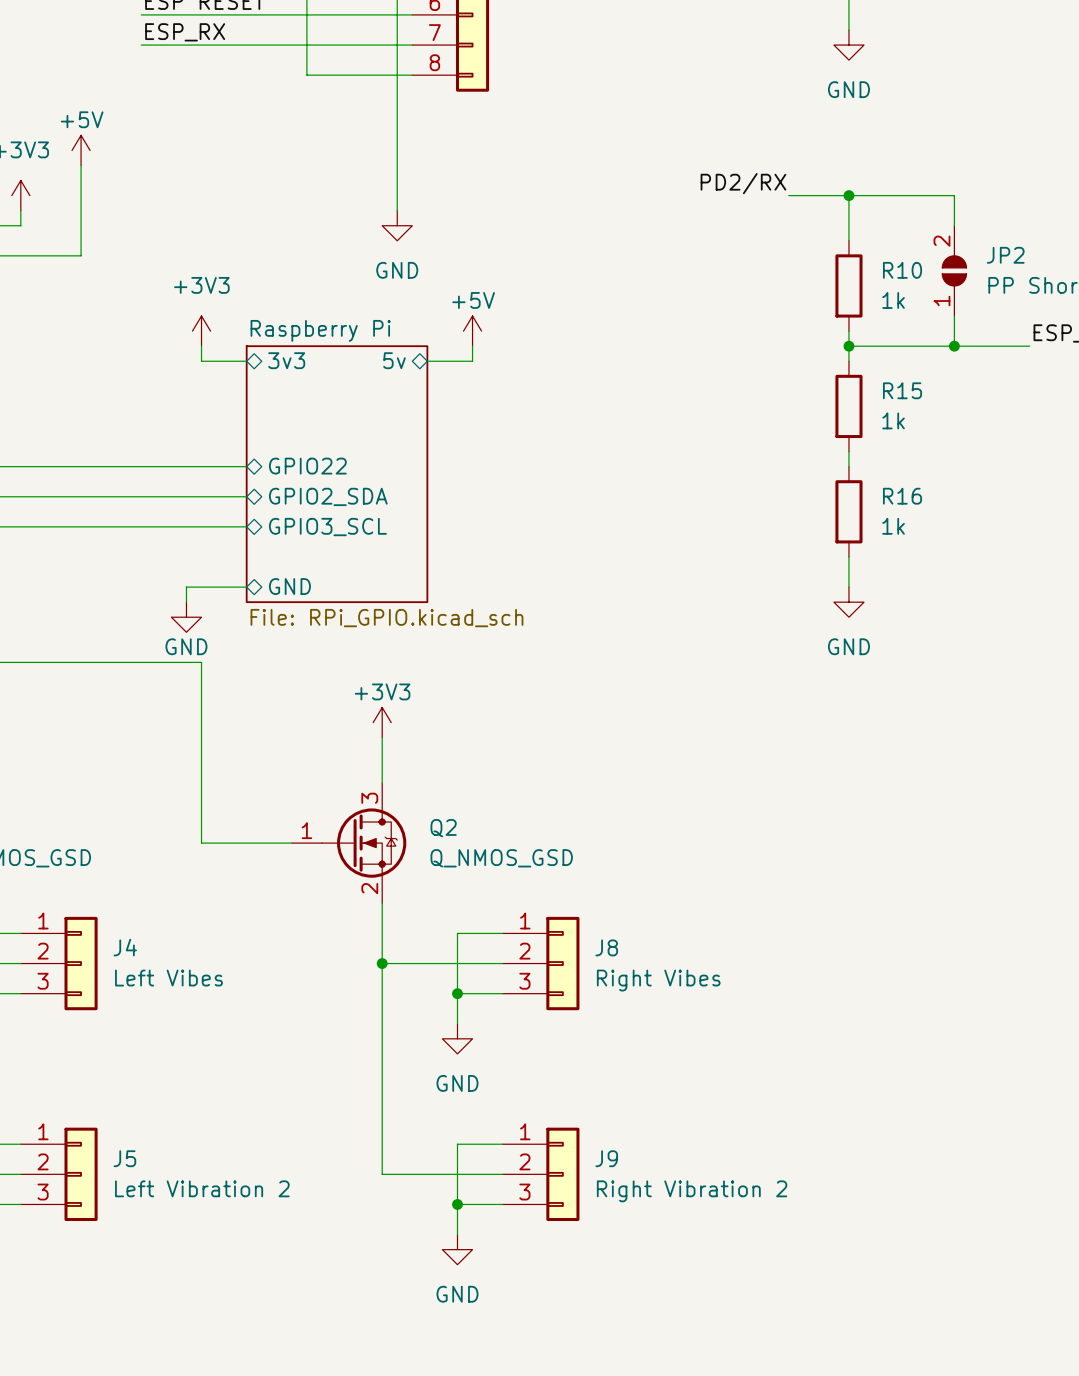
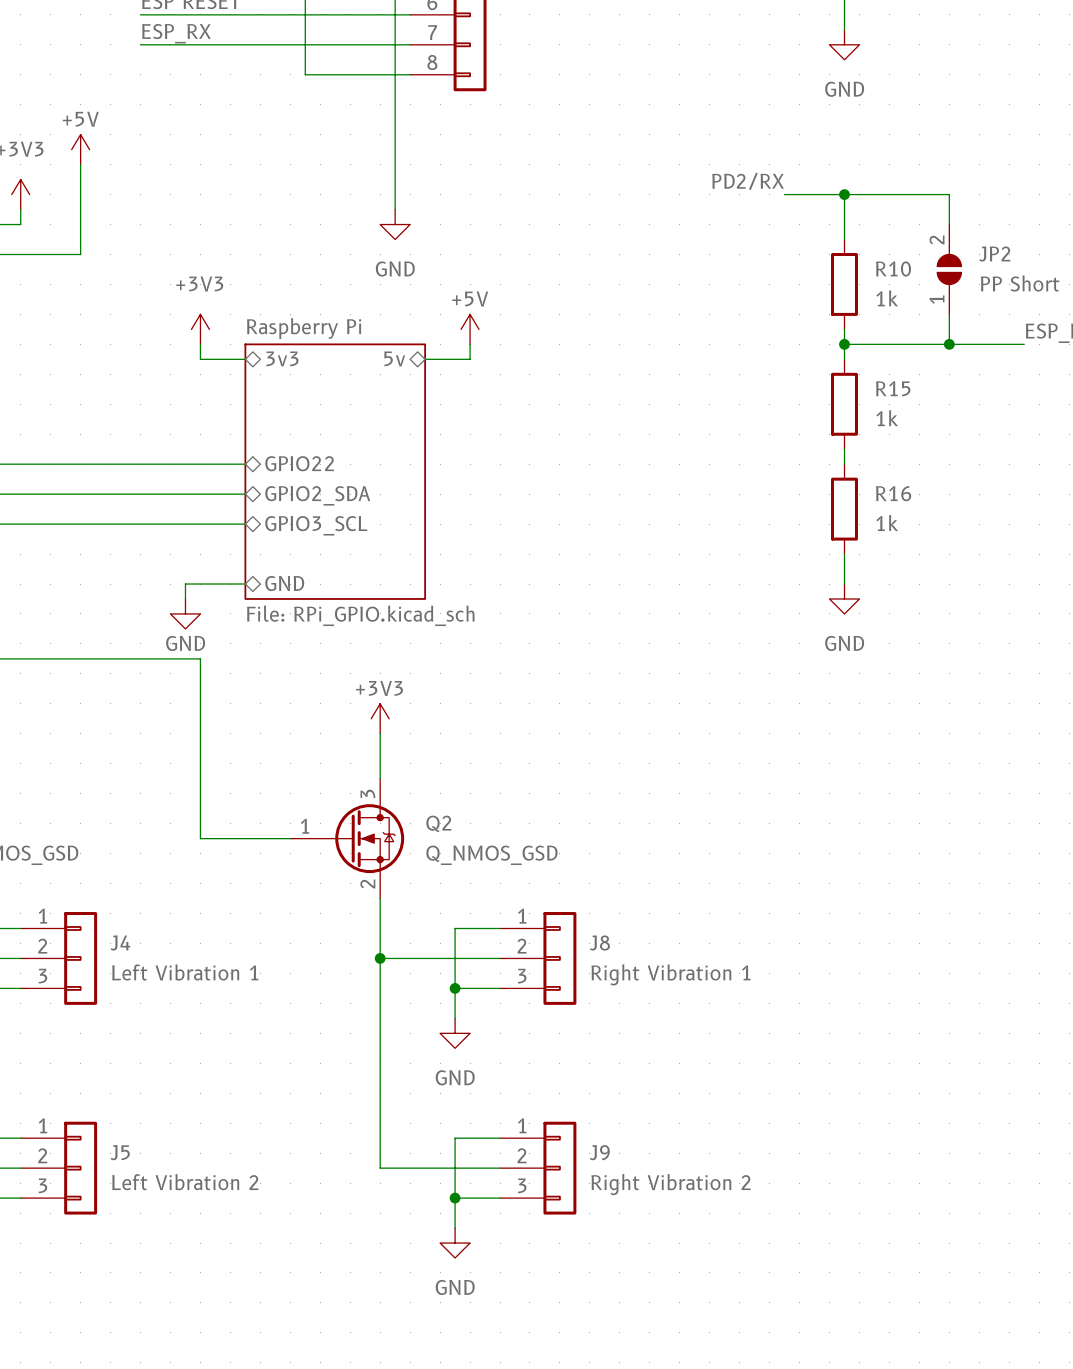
J4 value: Left Vibes (169, 978) -> Left Vibration 1 (185, 972)
J8 value: Right Vibes (658, 980) -> Right Vibration 1 (670, 974)

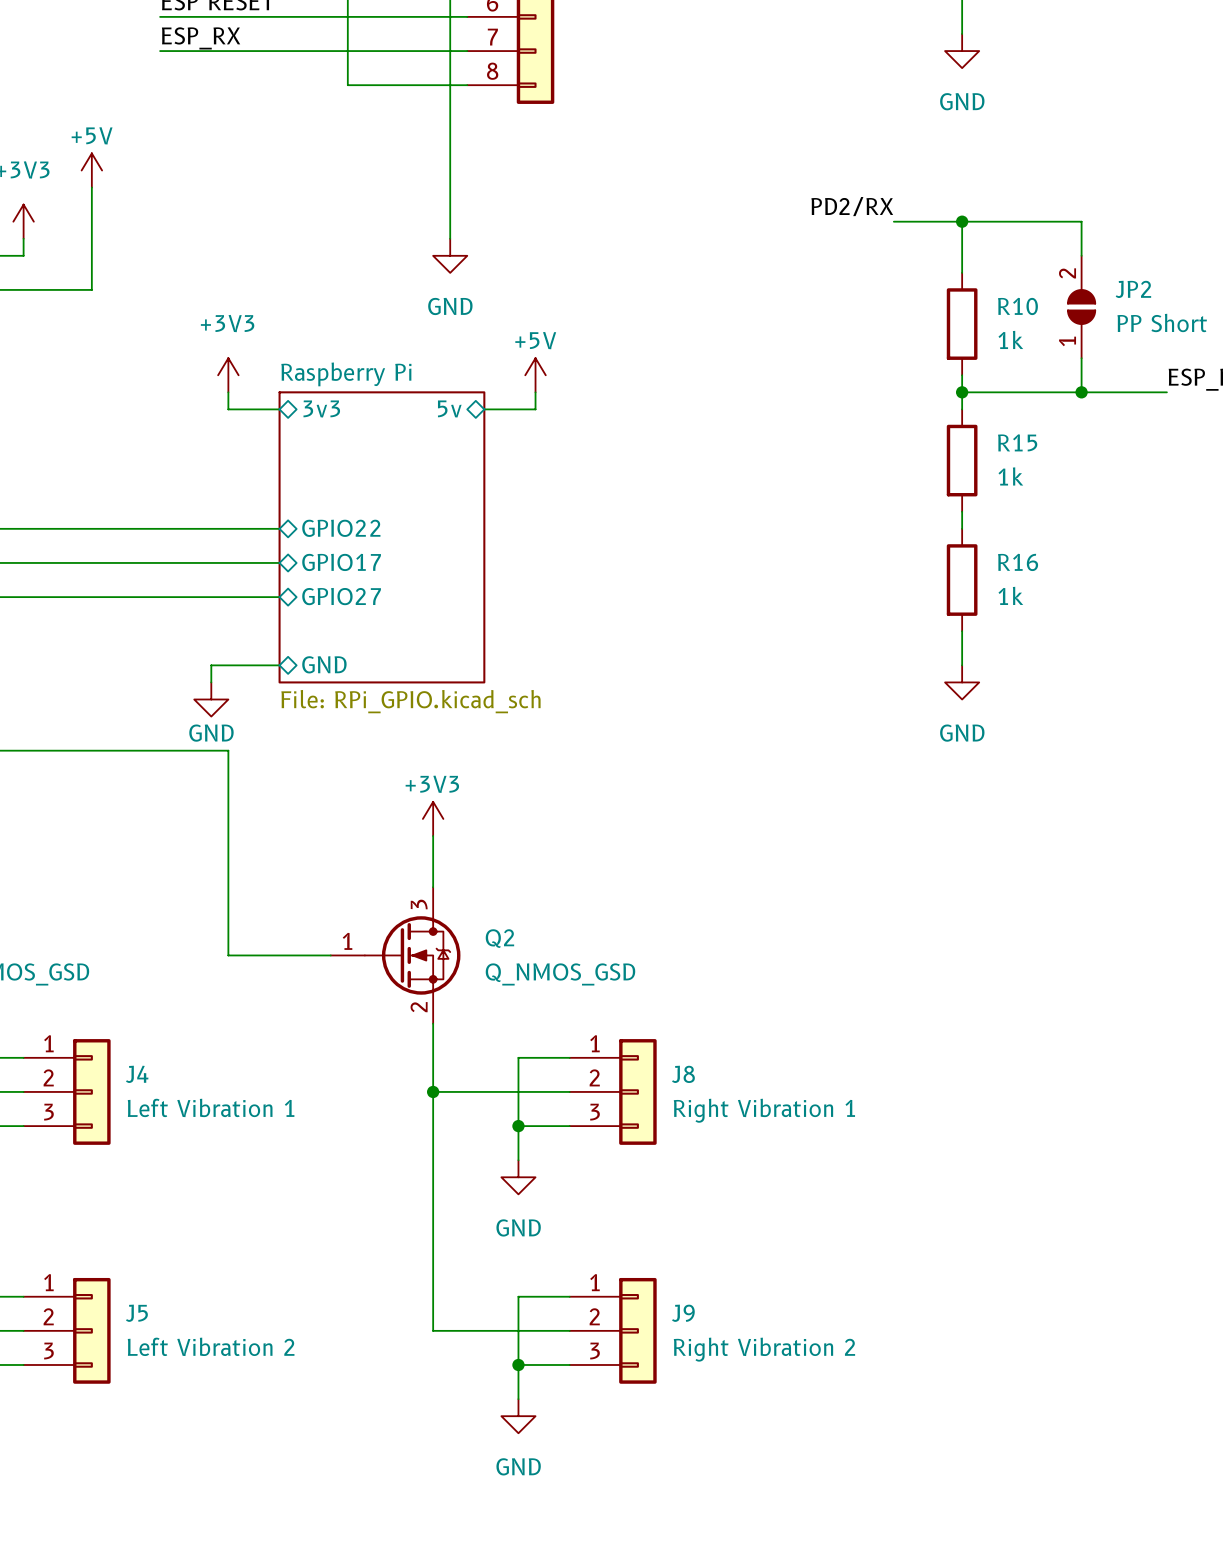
sheet pin: GPIO2_SDA (317, 495) -> GPIO17 (341, 562)
sheet pin: GPIO3_SCL (316, 525) -> GPIO27 (341, 596)

